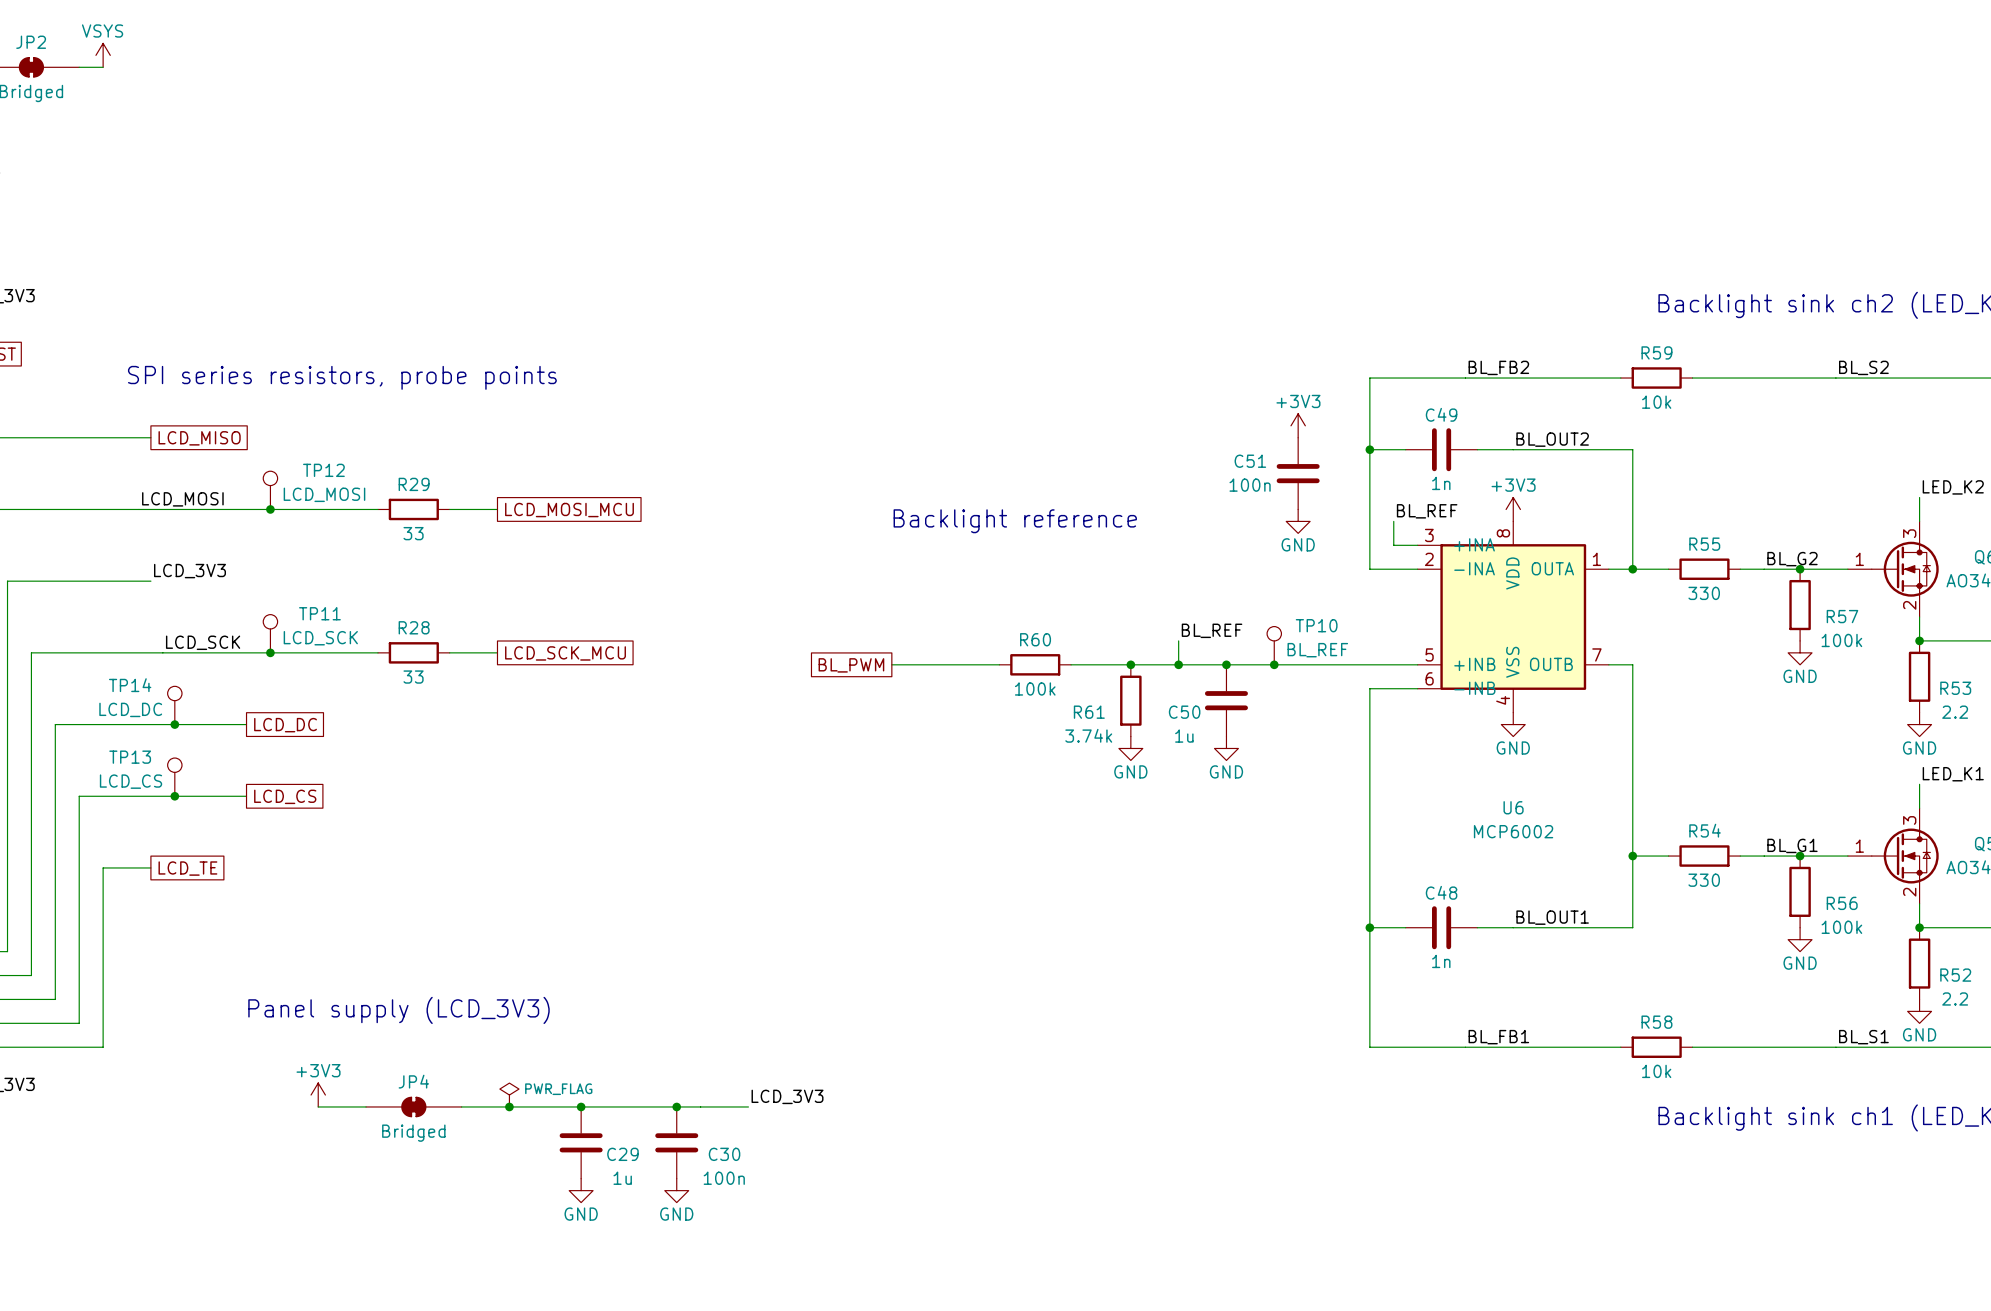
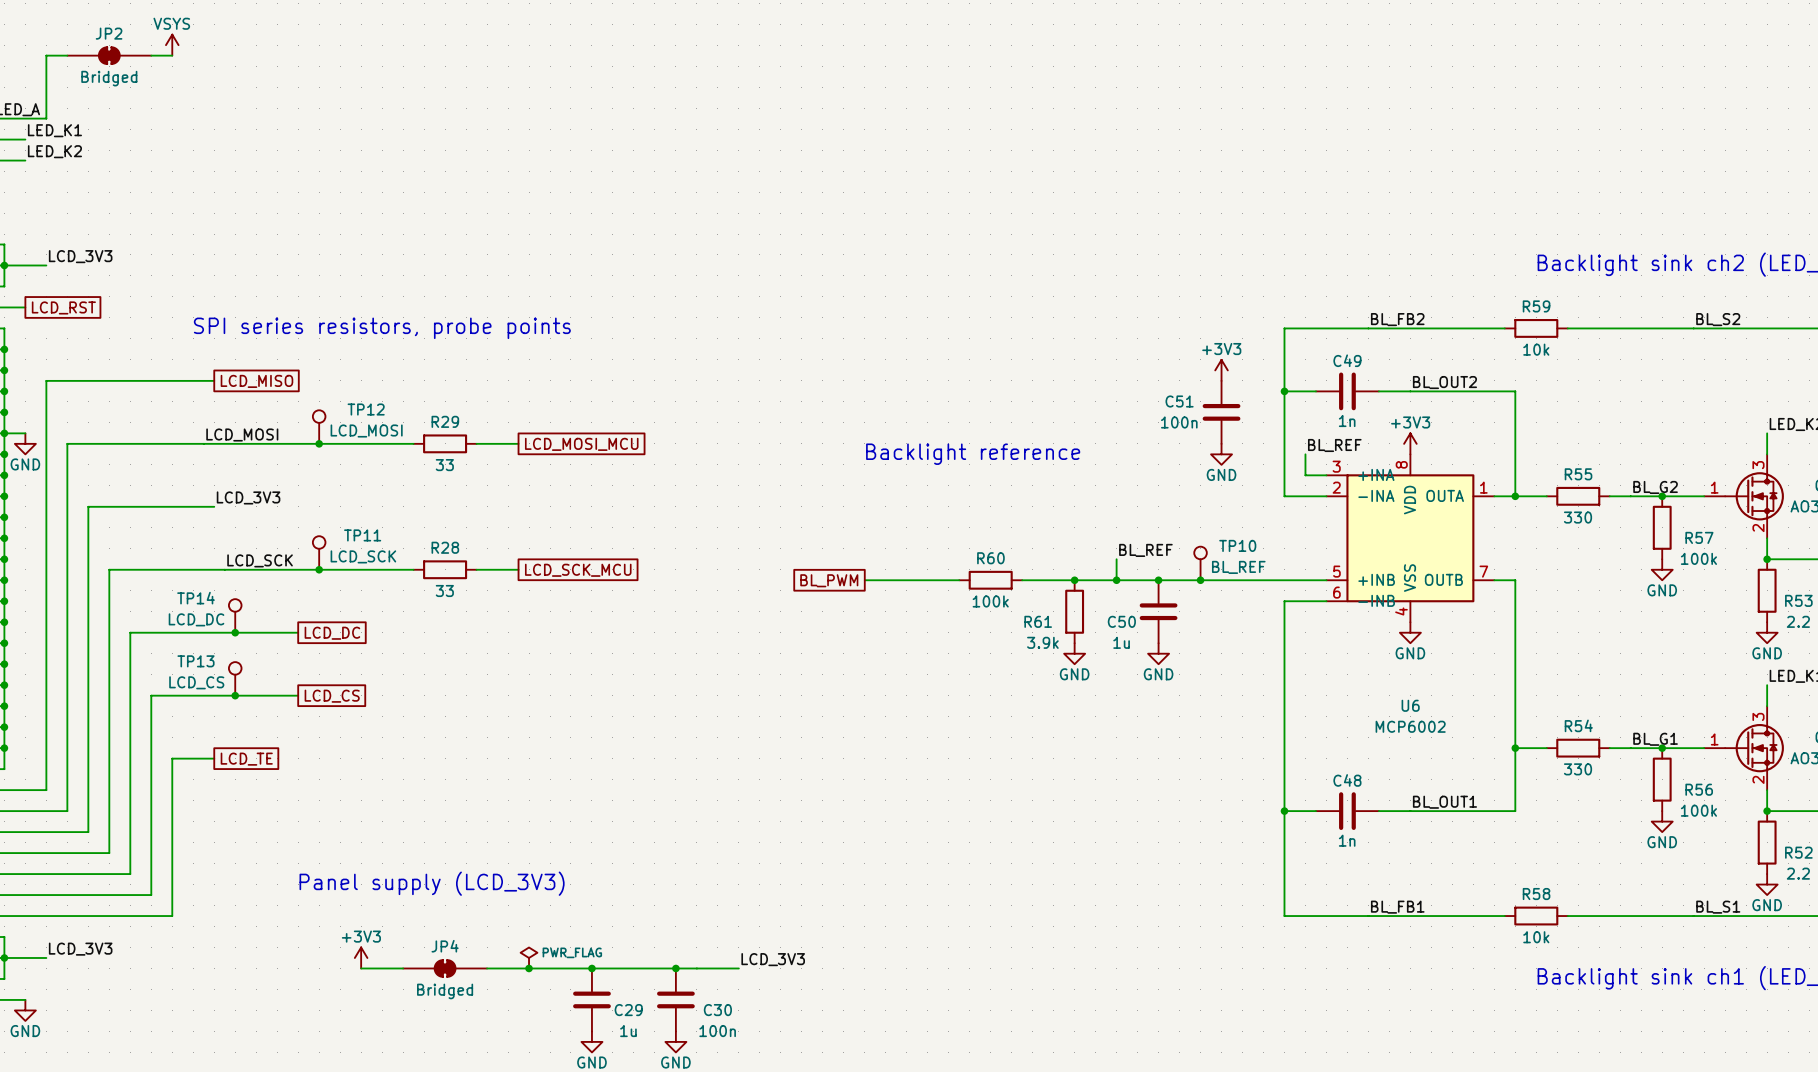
R61 value: 3.74k (1088, 735) -> 3.9k (1042, 642)

